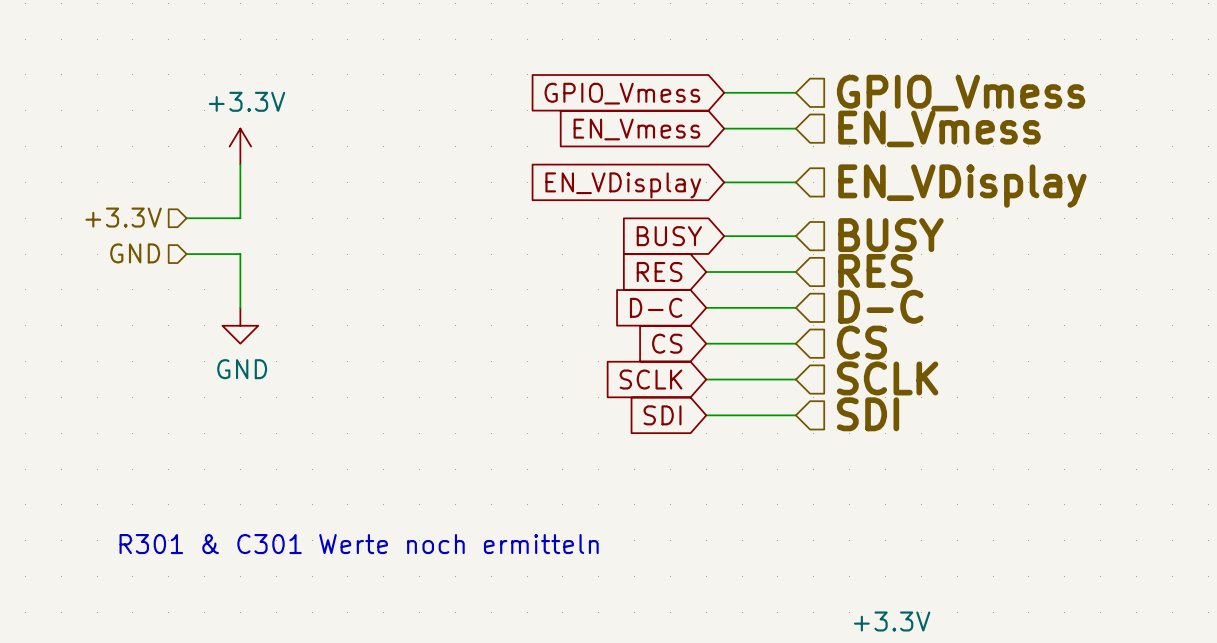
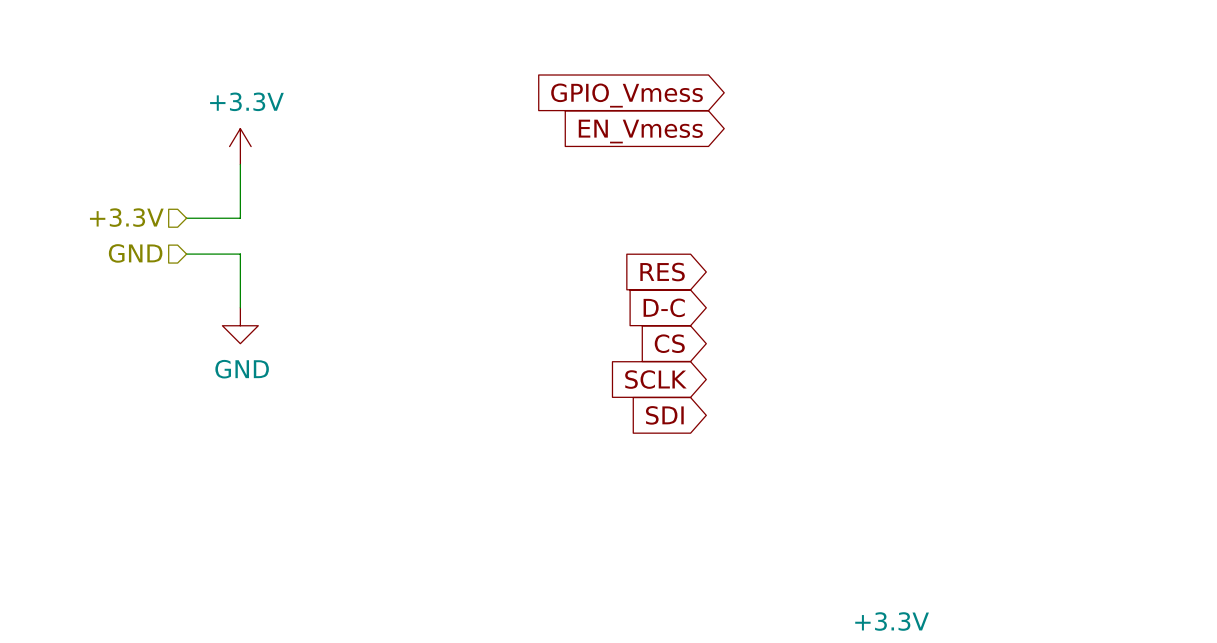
wire: (724, 92) (795, 92) -> none
hierarchical label: GPIO_Vmess (961, 93) -> none
wire: (724, 128) (795, 128) -> none
hierarchical label: EN_Vmess (939, 128) -> none
wire: (724, 182) (795, 182) -> none
global label: EN_VDisplay (623, 185) -> none
hierarchical label: EN_VDisplay (962, 186) -> none
hierarchical label: BUSY (890, 235) -> none
global label: BUSY (669, 236) -> none
wire: (724, 236) (795, 236) -> none
hierarchical label: RES (875, 270) -> none
wire: (706, 272) (795, 272) -> none
hierarchical label: D-C (880, 306) -> none
wire: (706, 307) (795, 307) -> none
hierarchical label: CS (861, 342) -> none
wire: (706, 343) (795, 343) -> none
hierarchical label: SCLK (887, 378) -> none
wire: (706, 379) (795, 379) -> none
hierarchical label: SDI (868, 414) -> none
wire: (706, 415) (795, 415) -> none
text: R301 & C301 Werte noch ermitteln (359, 544) -> none

